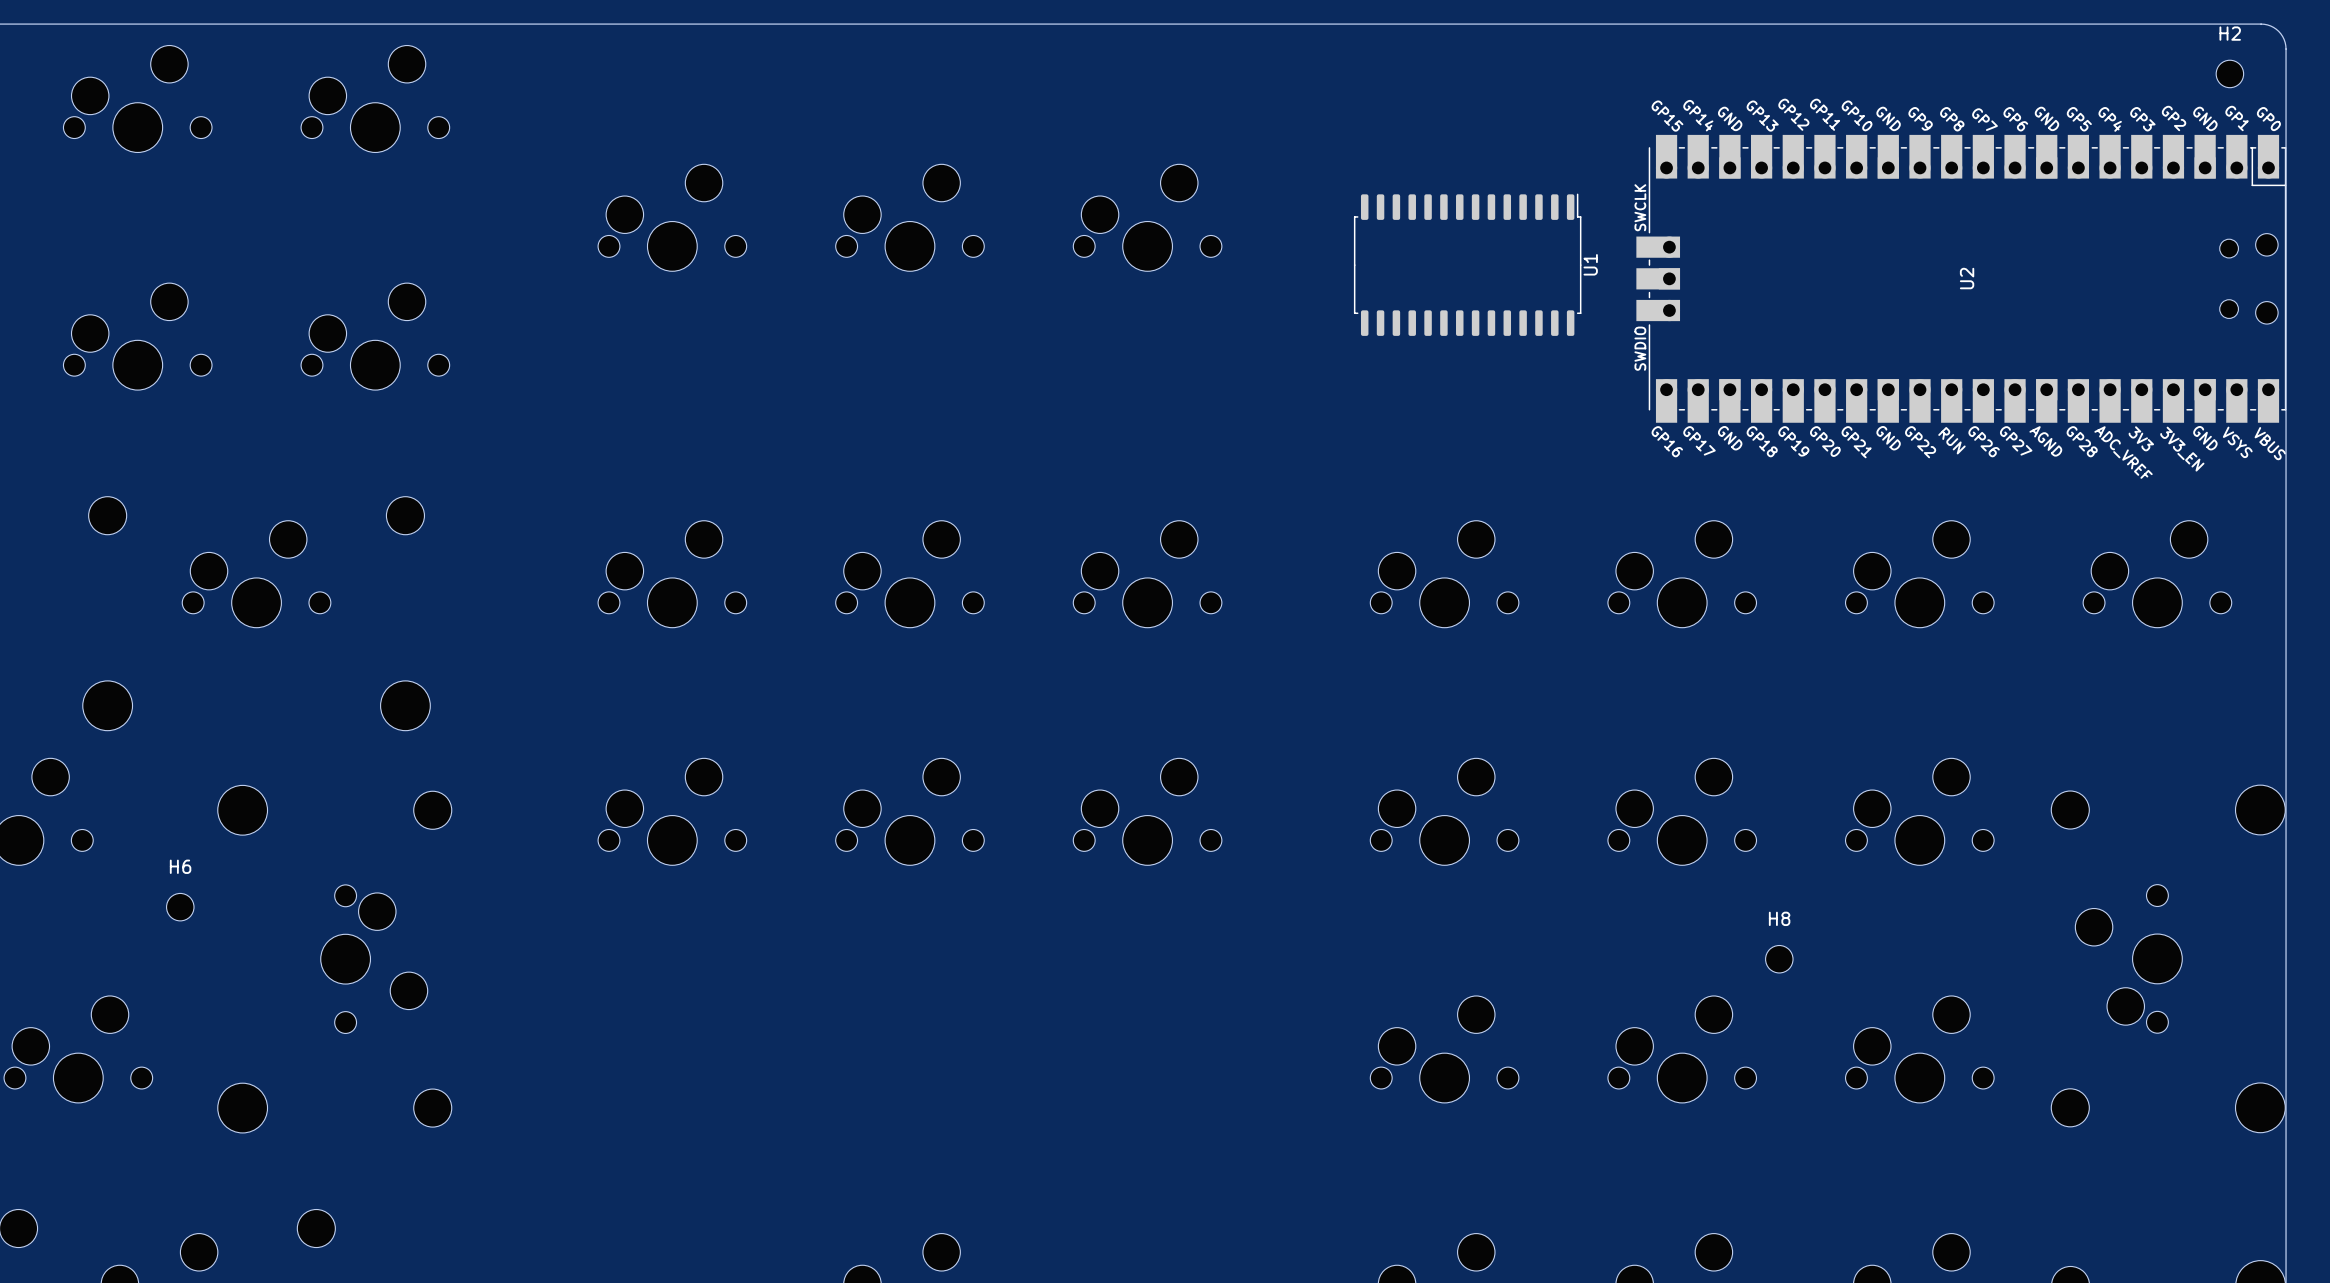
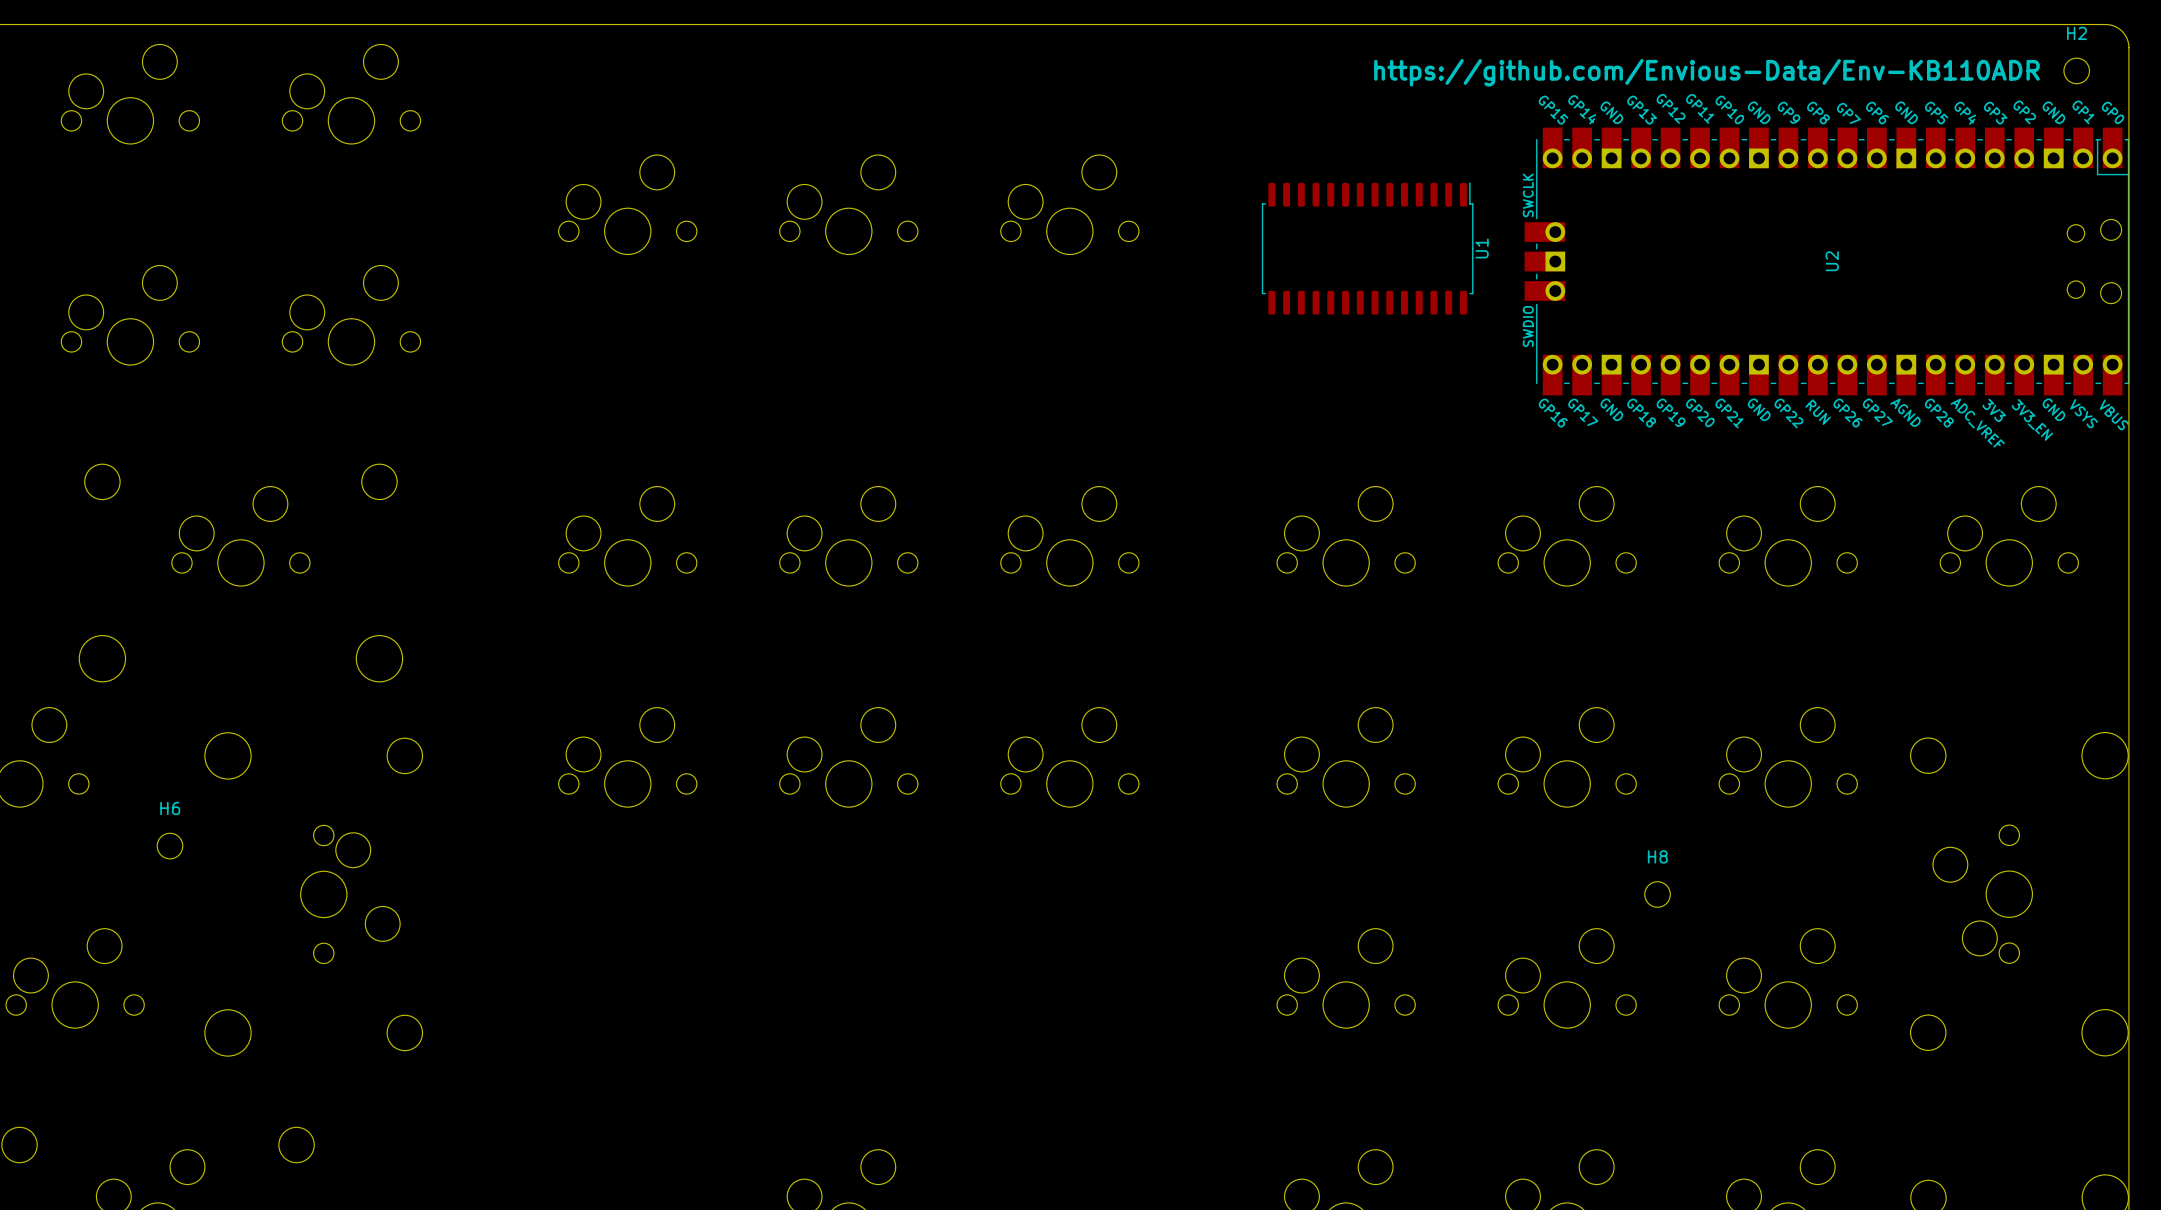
text: none -> https://github.com/Envious-Data/Env-KB110ADR (1706, 72)

